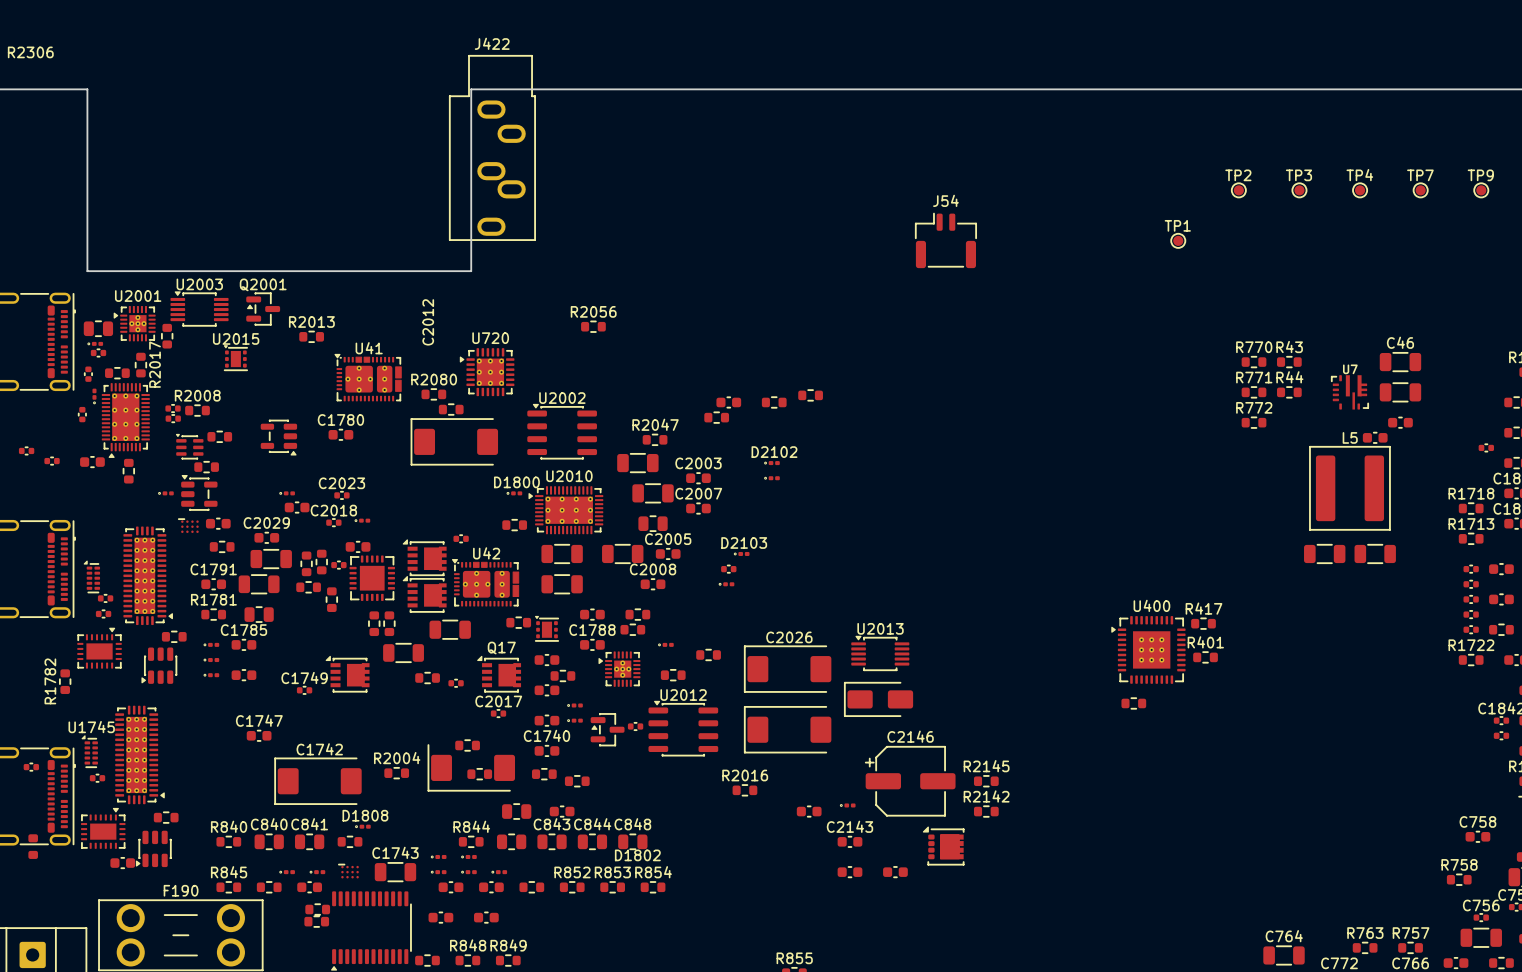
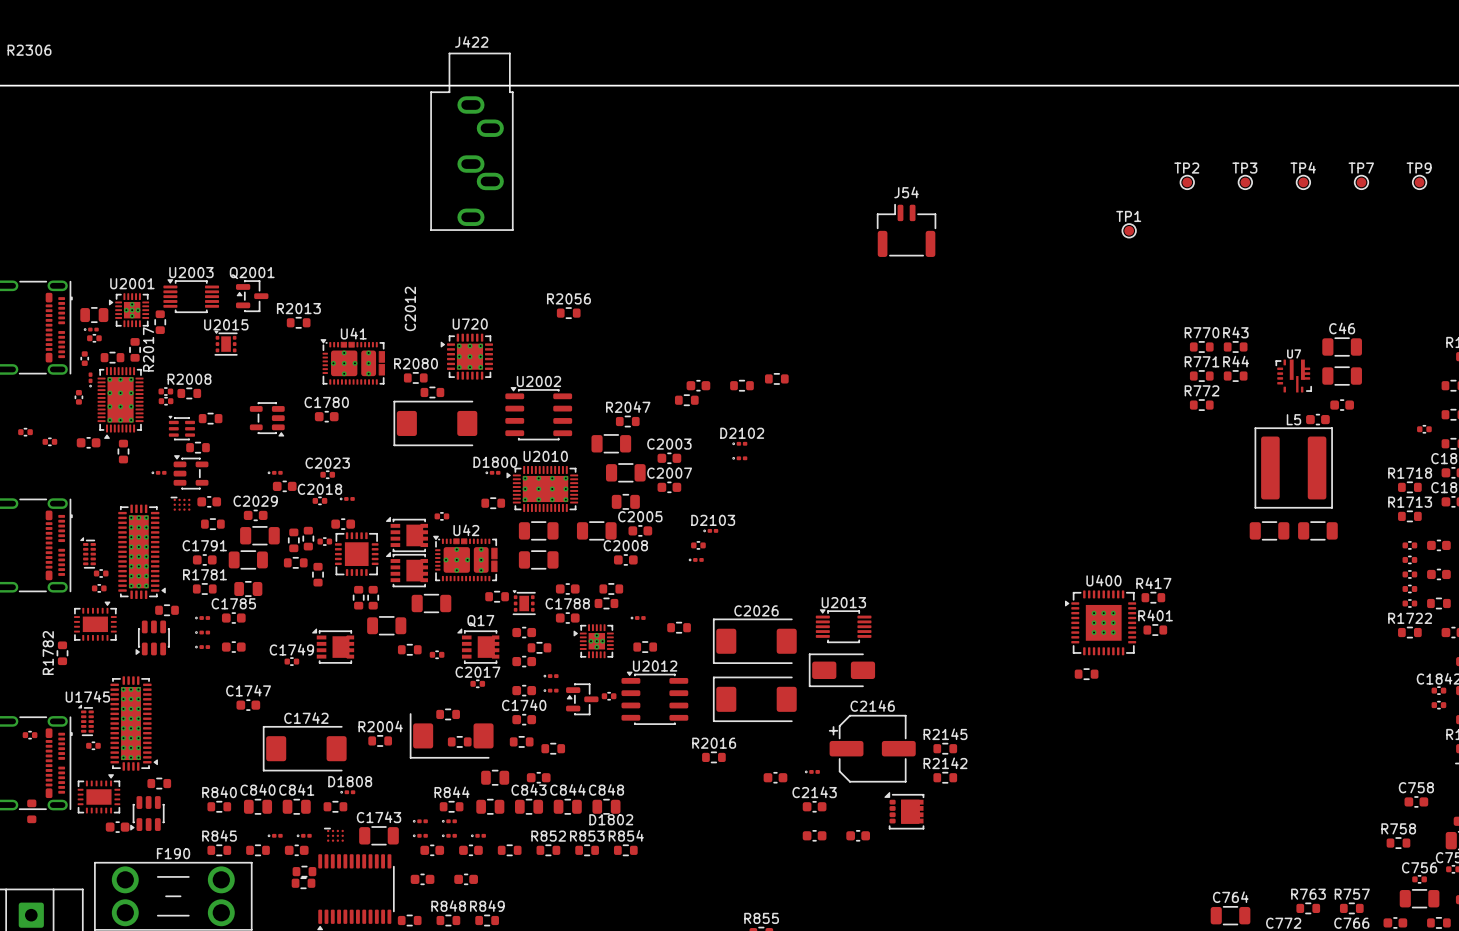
board edge: (87, 89) (87, 271) (471, 271) (471, 89) -> (83, 85) (451, 85)

